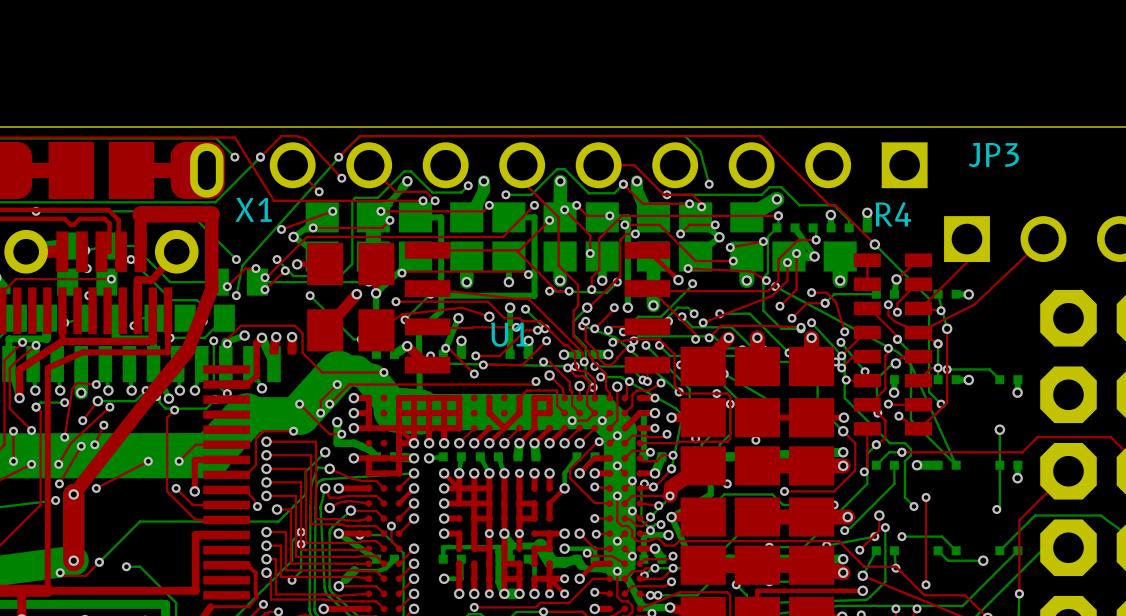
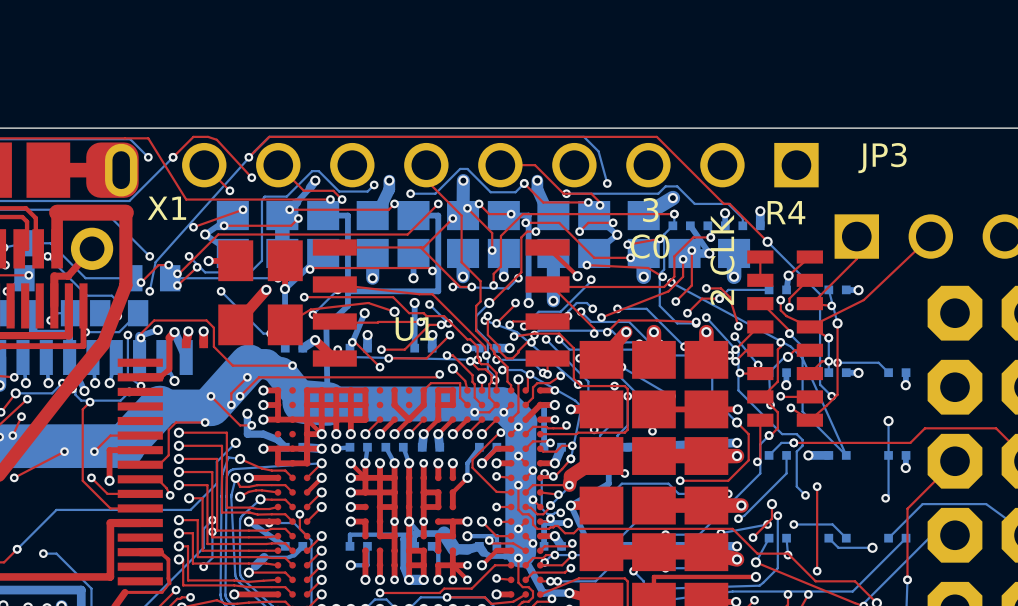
text: none -> 3 (650, 210)
text: none -> C0 (650, 246)
text: none -> 2 CLK (722, 259)

